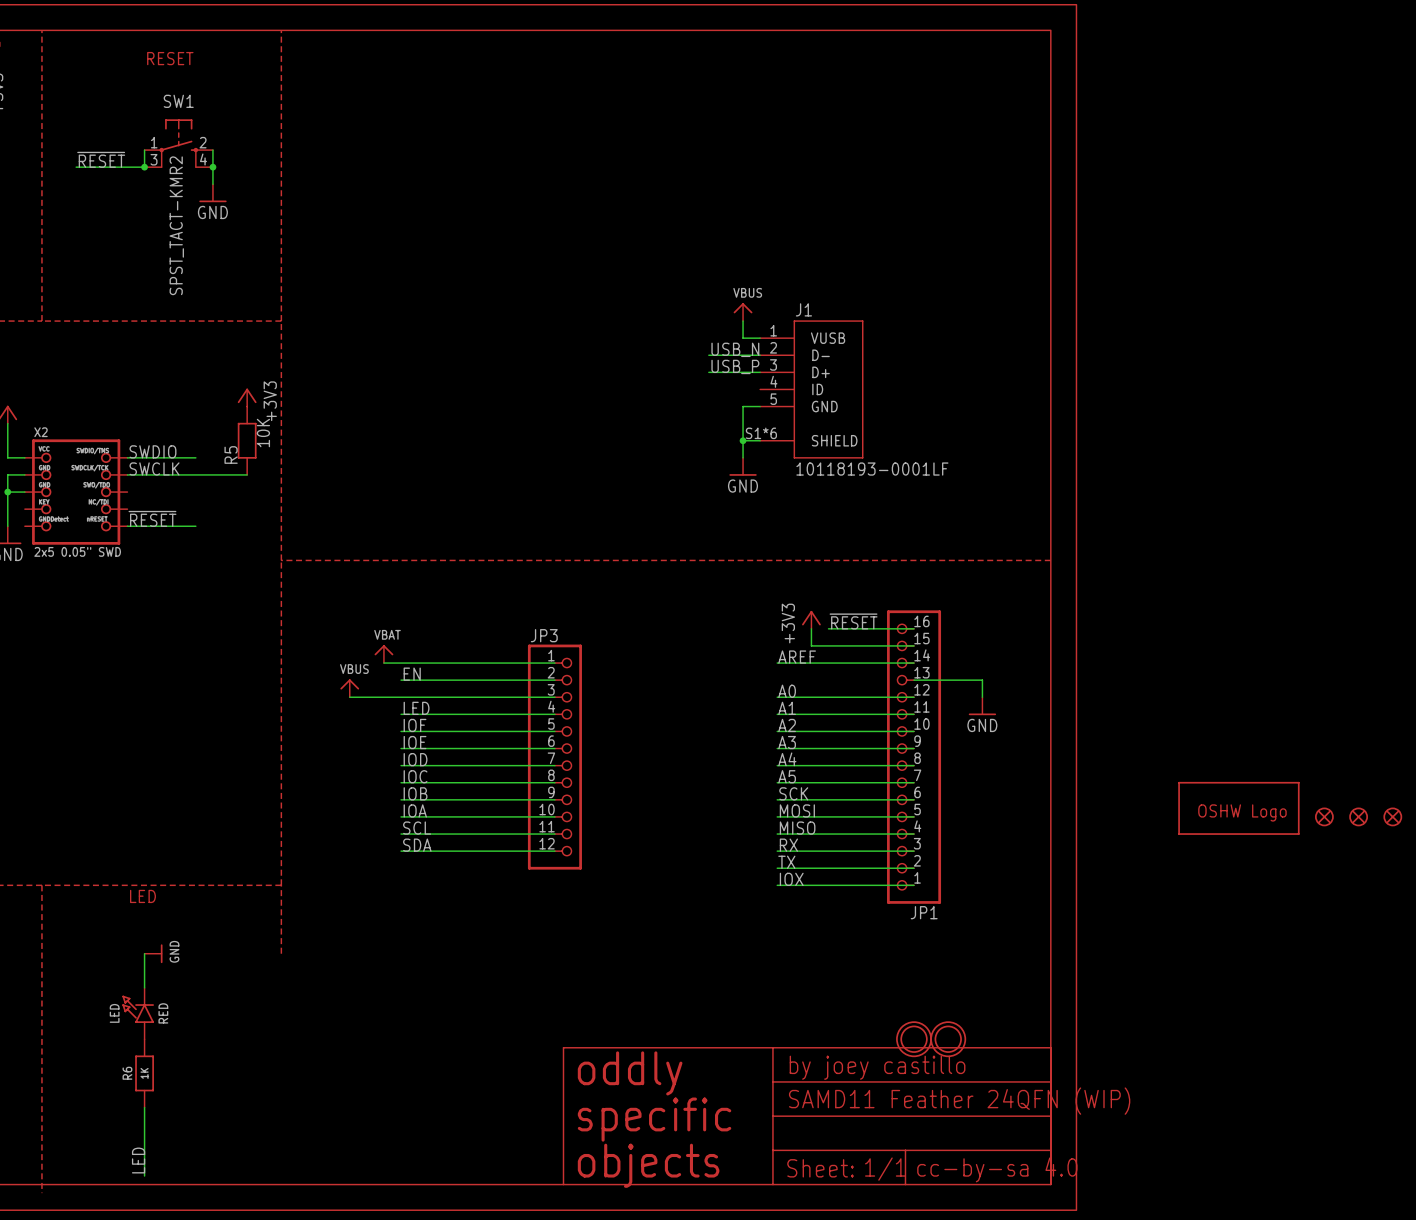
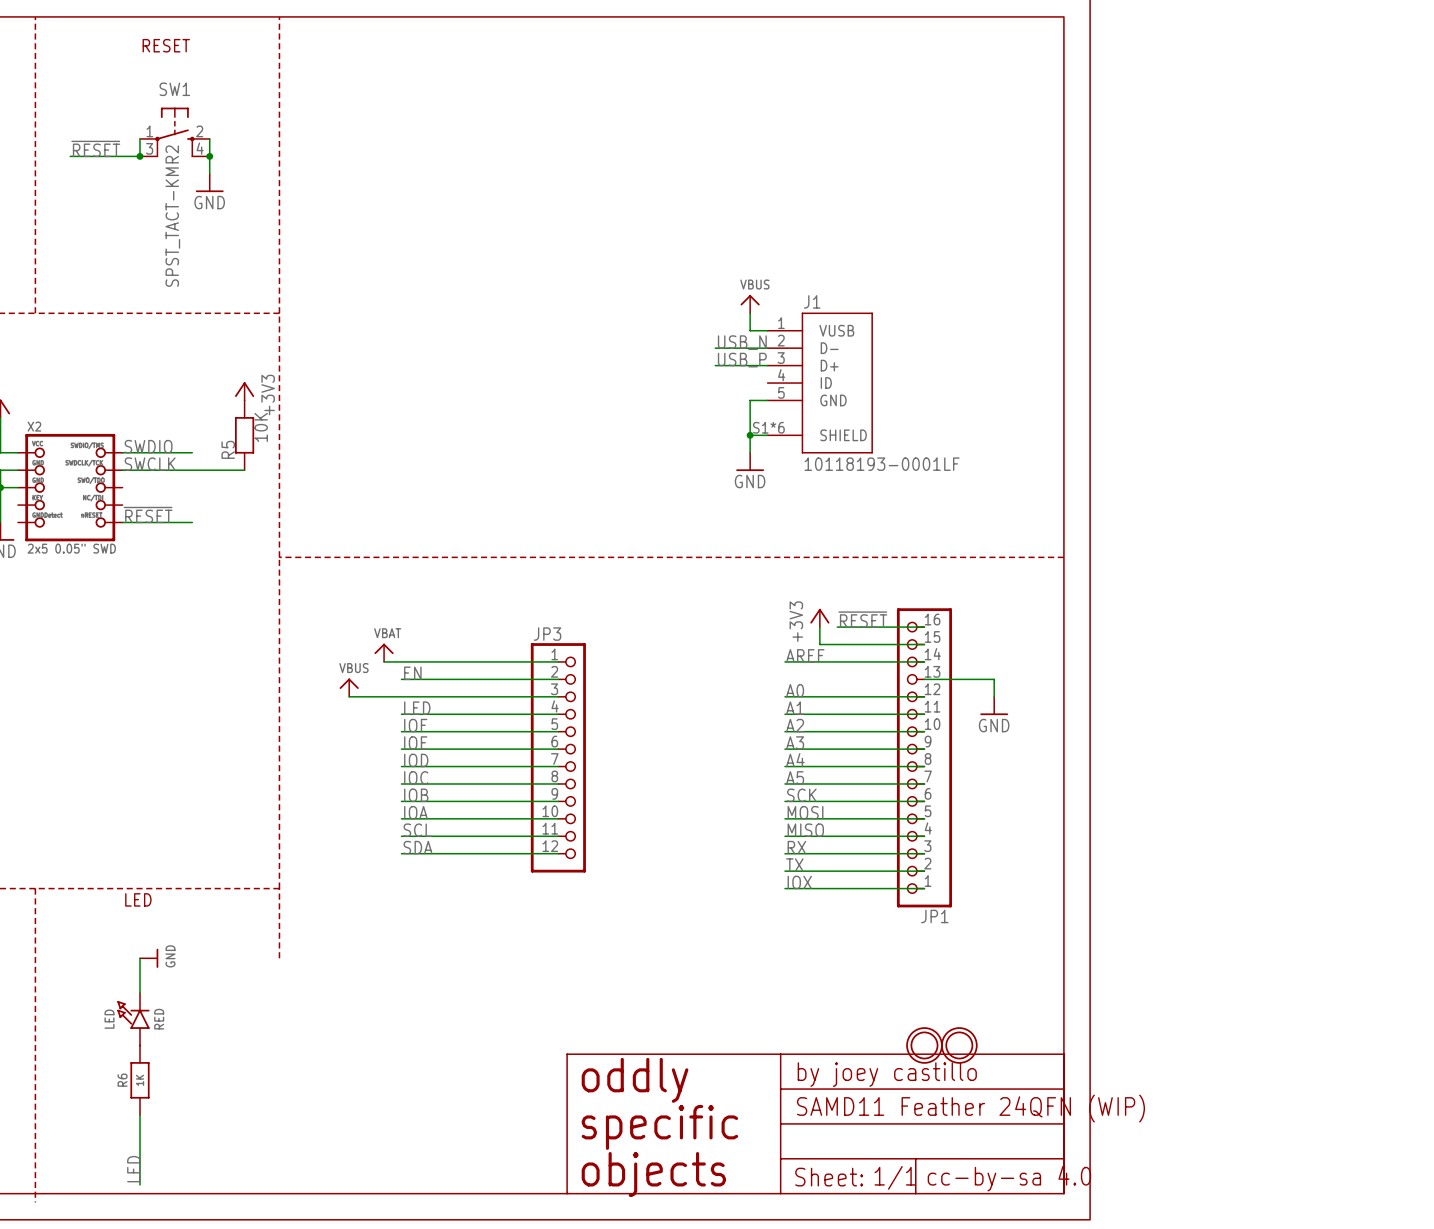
part: (1238, 808) -> none
part: (1324, 816) -> none
part: (1358, 816) -> none
part: (1392, 816) -> none

